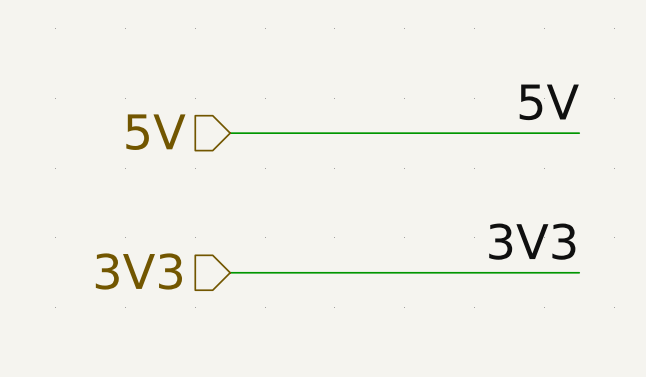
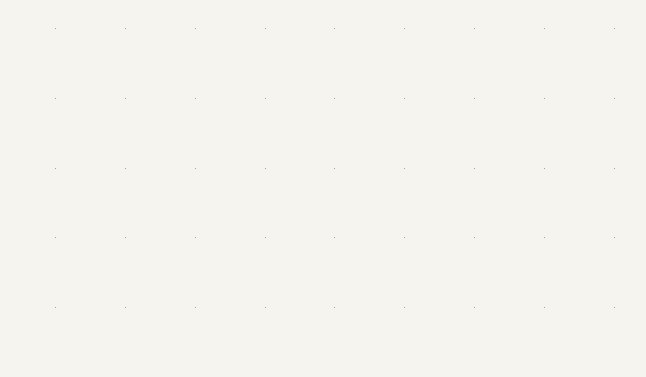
label: 5V (549, 102) -> none
hierarchical label: 5V (155, 132) -> none
wire: (230, 133) (579, 133) -> none
label: 3V3 (532, 241) -> none
hierarchical label: 3V3 (138, 271) -> none
wire: (230, 272) (579, 272) -> none

